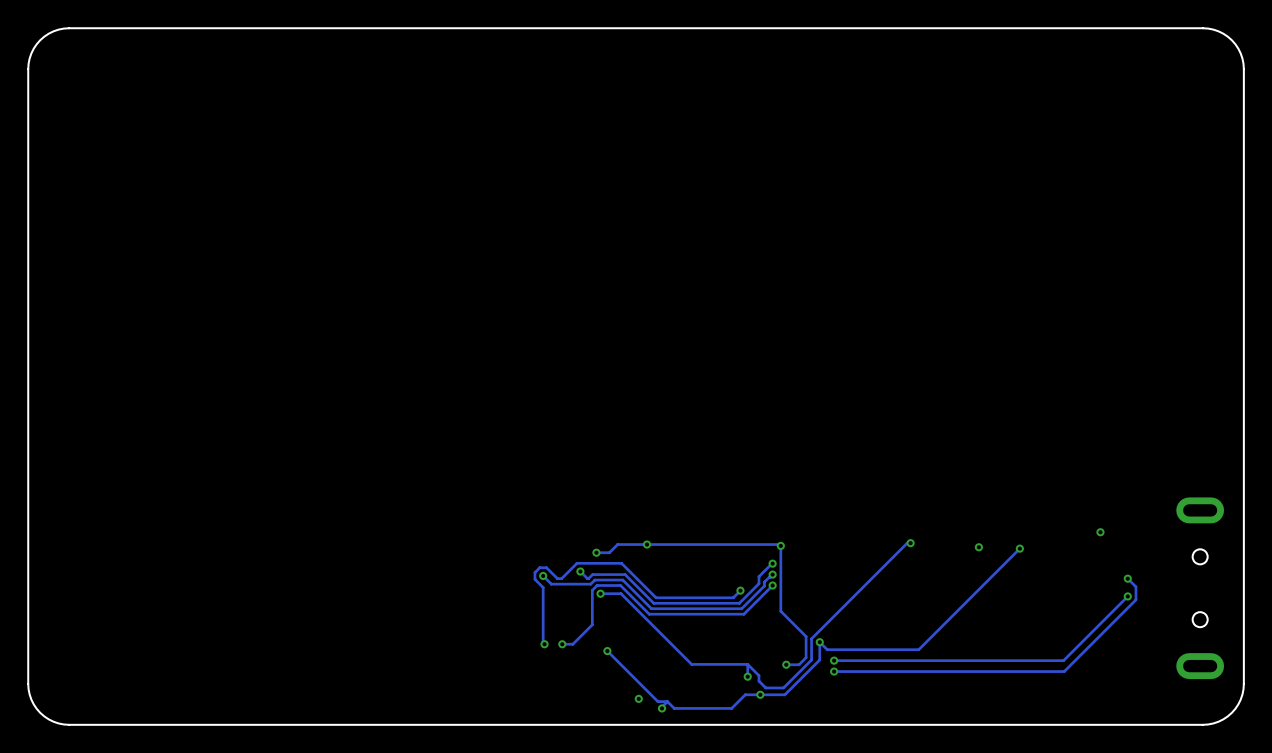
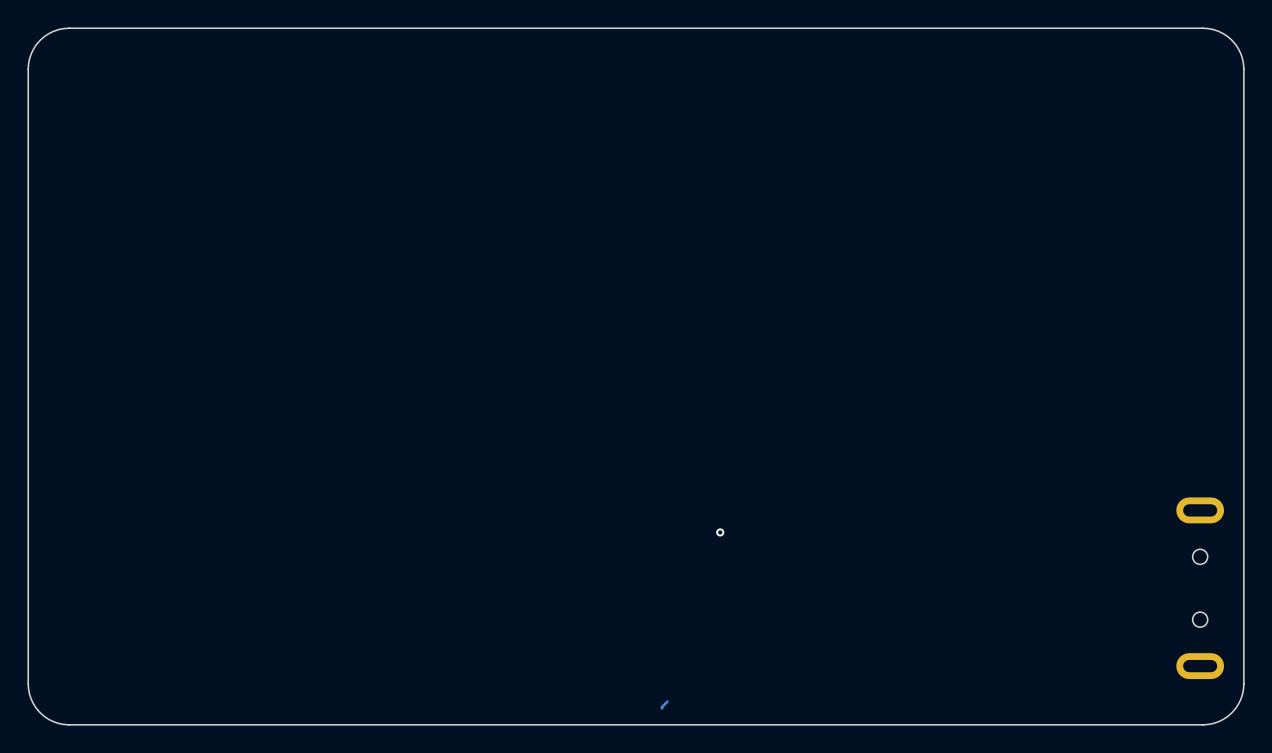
via: none -> (720, 532)
via: (1100, 532) -> none
track: (910, 543) (907, 543) (811, 638) (811, 659) (783, 687) (765, 687) (758, 681) (758, 675) (747, 664) -> none
via: (910, 543) -> none
via: (646, 544) -> none
via: (780, 545) -> none
via: (978, 547) -> none
track: (1019, 548) (918, 649) (827, 649) (819, 642) (819, 659) (784, 694) (745, 694) (731, 708) (674, 708) (667, 701) (657, 701) (607, 651) -> none
via: (1019, 548) -> none
track: (596, 552) (609, 552) (617, 544) (779, 544) (780, 611) (806, 636) (806, 657) (799, 664) (786, 664) -> none
via: (596, 552) -> none
track: (772, 563) (758, 576) (758, 583) (739, 603) (653, 603) (625, 574) (592, 574) (587, 578) (580, 571) -> none
via: (772, 563) -> none
via: (580, 571) -> none
track: (772, 574) (764, 582) (764, 585) (741, 608) (651, 608) (622, 580) (594, 580) (590, 584) (551, 584) (543, 575) -> none
via: (772, 574) -> none
via: (543, 575) -> none
track: (1127, 578) (1135, 586) (1135, 599) (1064, 671) (834, 671) -> none
via: (1127, 578) -> none
track: (772, 585) (743, 614) (649, 614) (620, 585) (597, 585) (592, 590) (592, 624) (572, 644) (562, 644) -> none
via: (772, 585) -> none
track: (740, 590) (733, 597) (656, 597) (621, 563) (576, 563) (561, 578) (557, 578) (546, 567) (539, 567) (534, 572) (534, 579) (543, 587) (544, 644) -> none
via: (740, 590) -> none
track: (600, 593) (621, 593) (691, 664) (747, 664) -> none
via: (600, 593) -> none
track: (1127, 596) (1063, 660) (834, 660) -> none
via: (1127, 596) -> none
via: (819, 642) -> none
via: (544, 644) -> none
via: (562, 644) -> none
via: (607, 651) -> none
via: (834, 660) -> none
track: (747, 664) (747, 676) -> none
via: (786, 664) -> none
via: (834, 671) -> none
via: (747, 676) -> none
via: (760, 694) -> none
via: (638, 698) -> none
via: (662, 708) -> none

